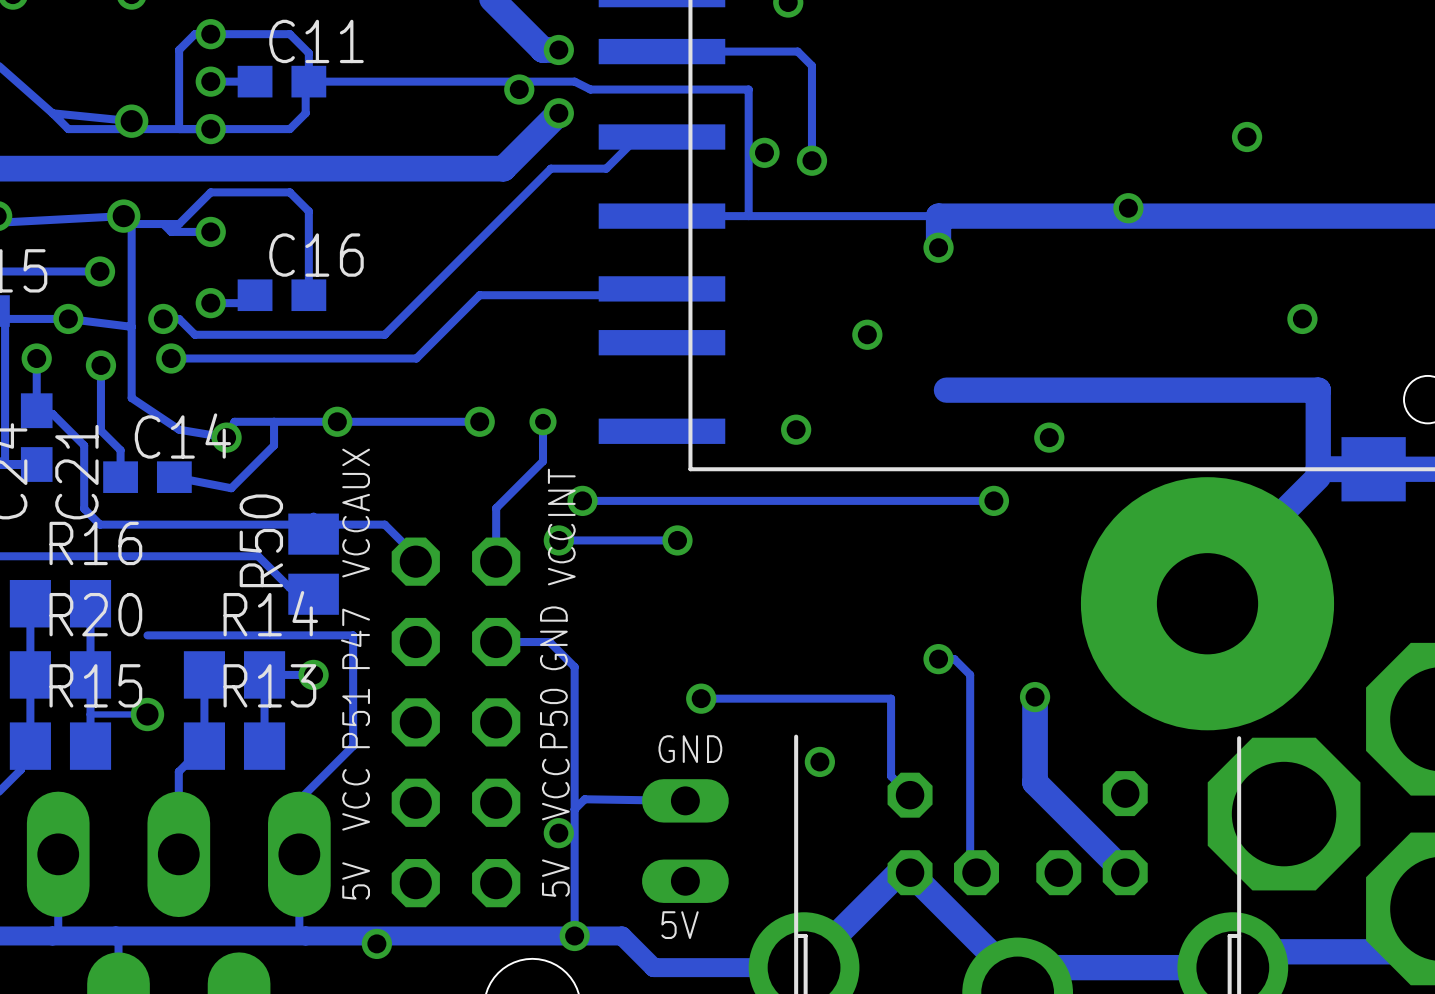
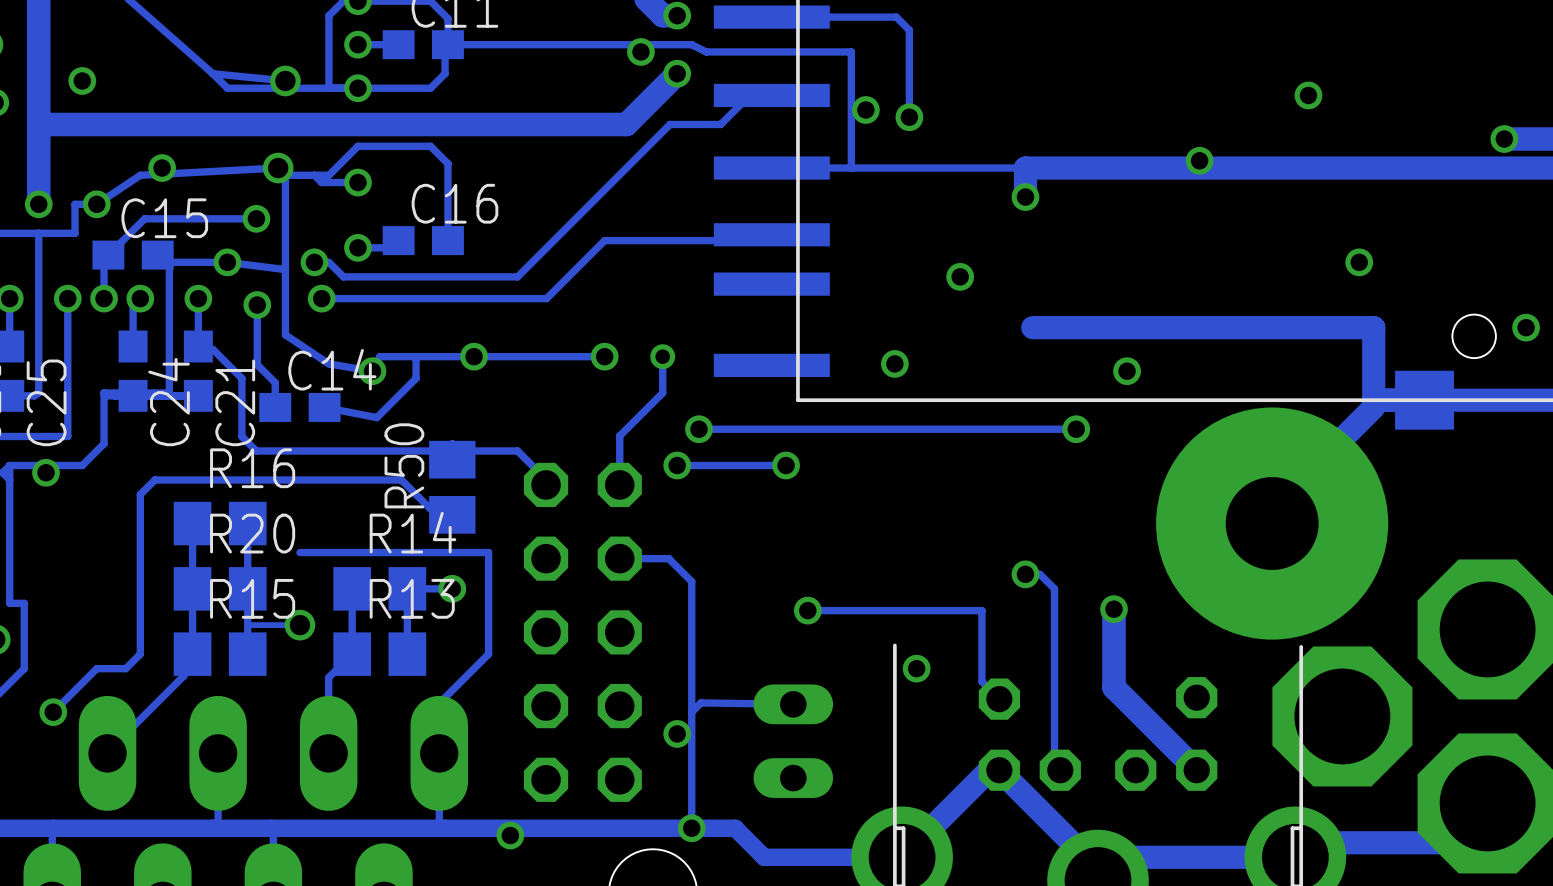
text: VCCAUX (356, 513) -> none
text: VCCINT (561, 527) -> none
text: P47 (355, 638) -> none
text: GND (553, 638) -> none
text: P51 (356, 718) -> none
text: P50 (553, 718) -> none
text: GND (690, 749) -> none
text: VCC (555, 789) -> none
text: VCC (356, 799) -> none
text: 5V (555, 878) -> none
text: 5V (356, 880) -> none
text: 5V (680, 925) -> none

